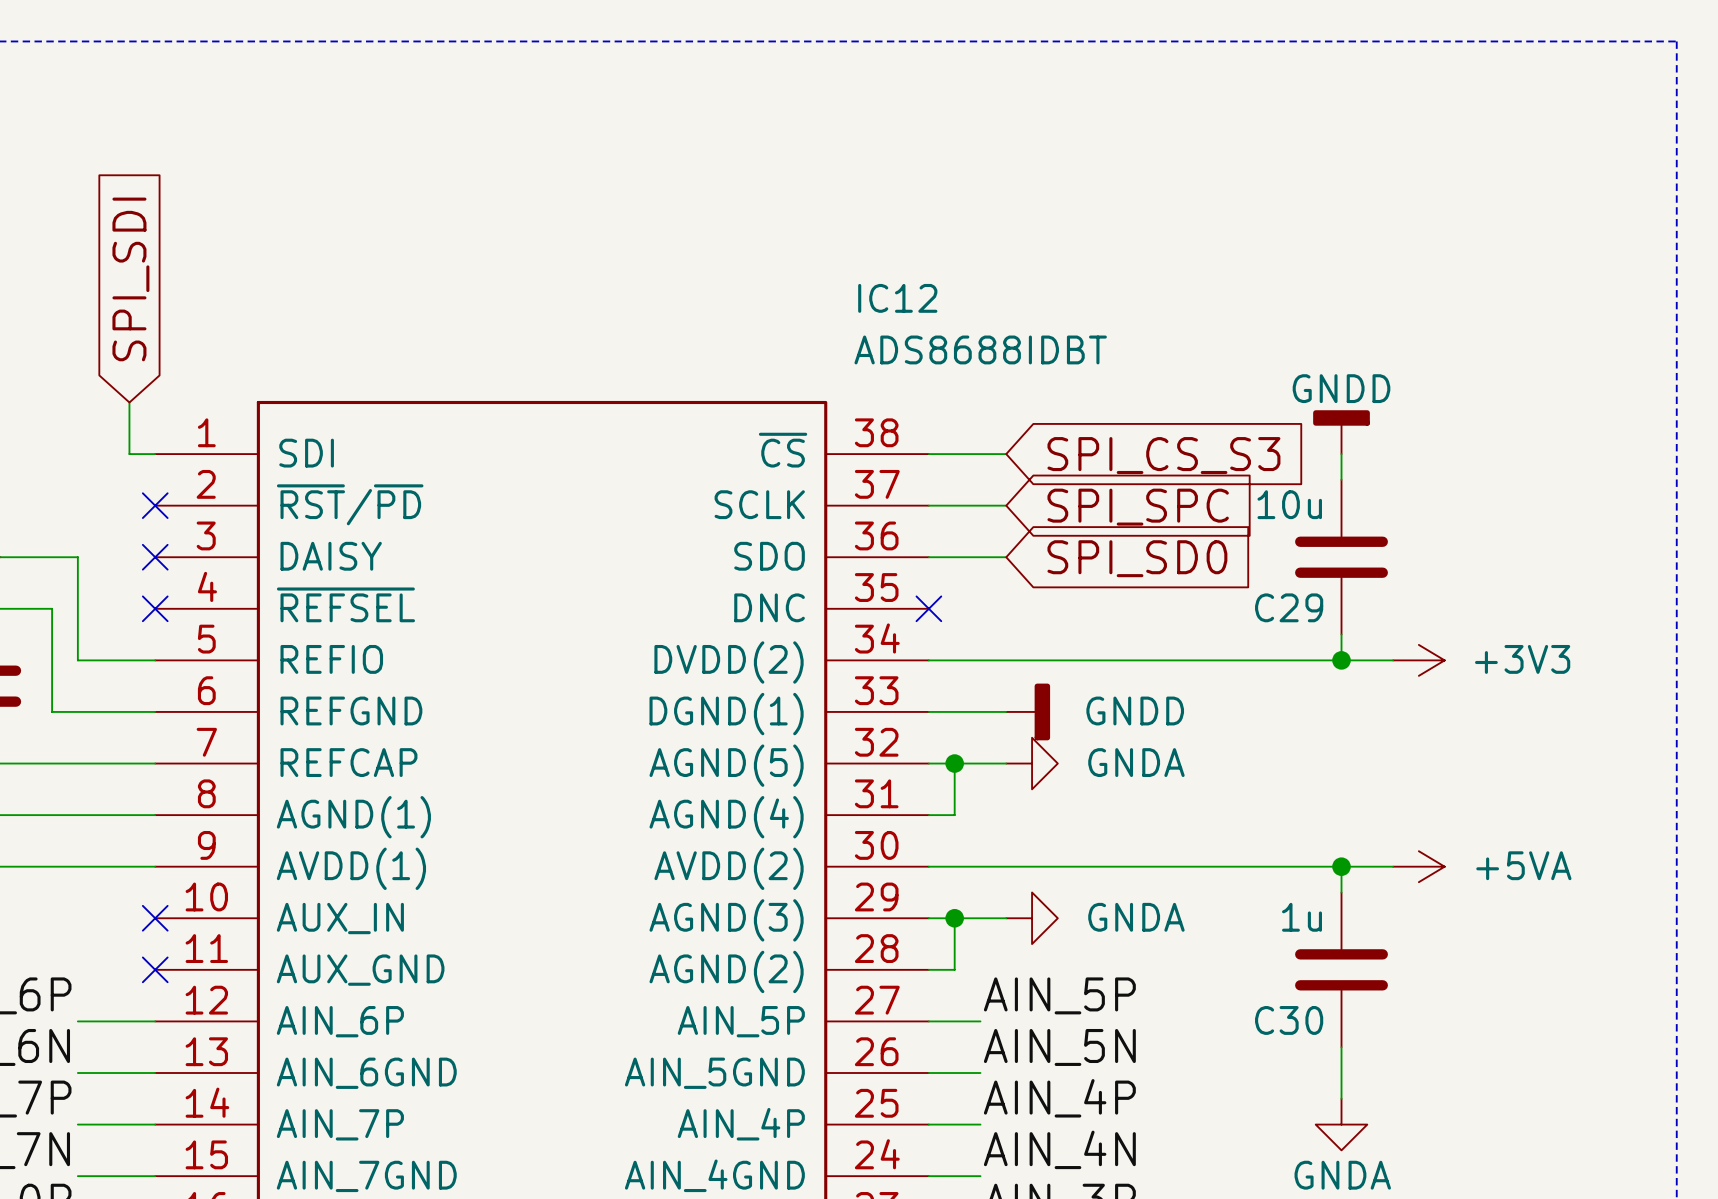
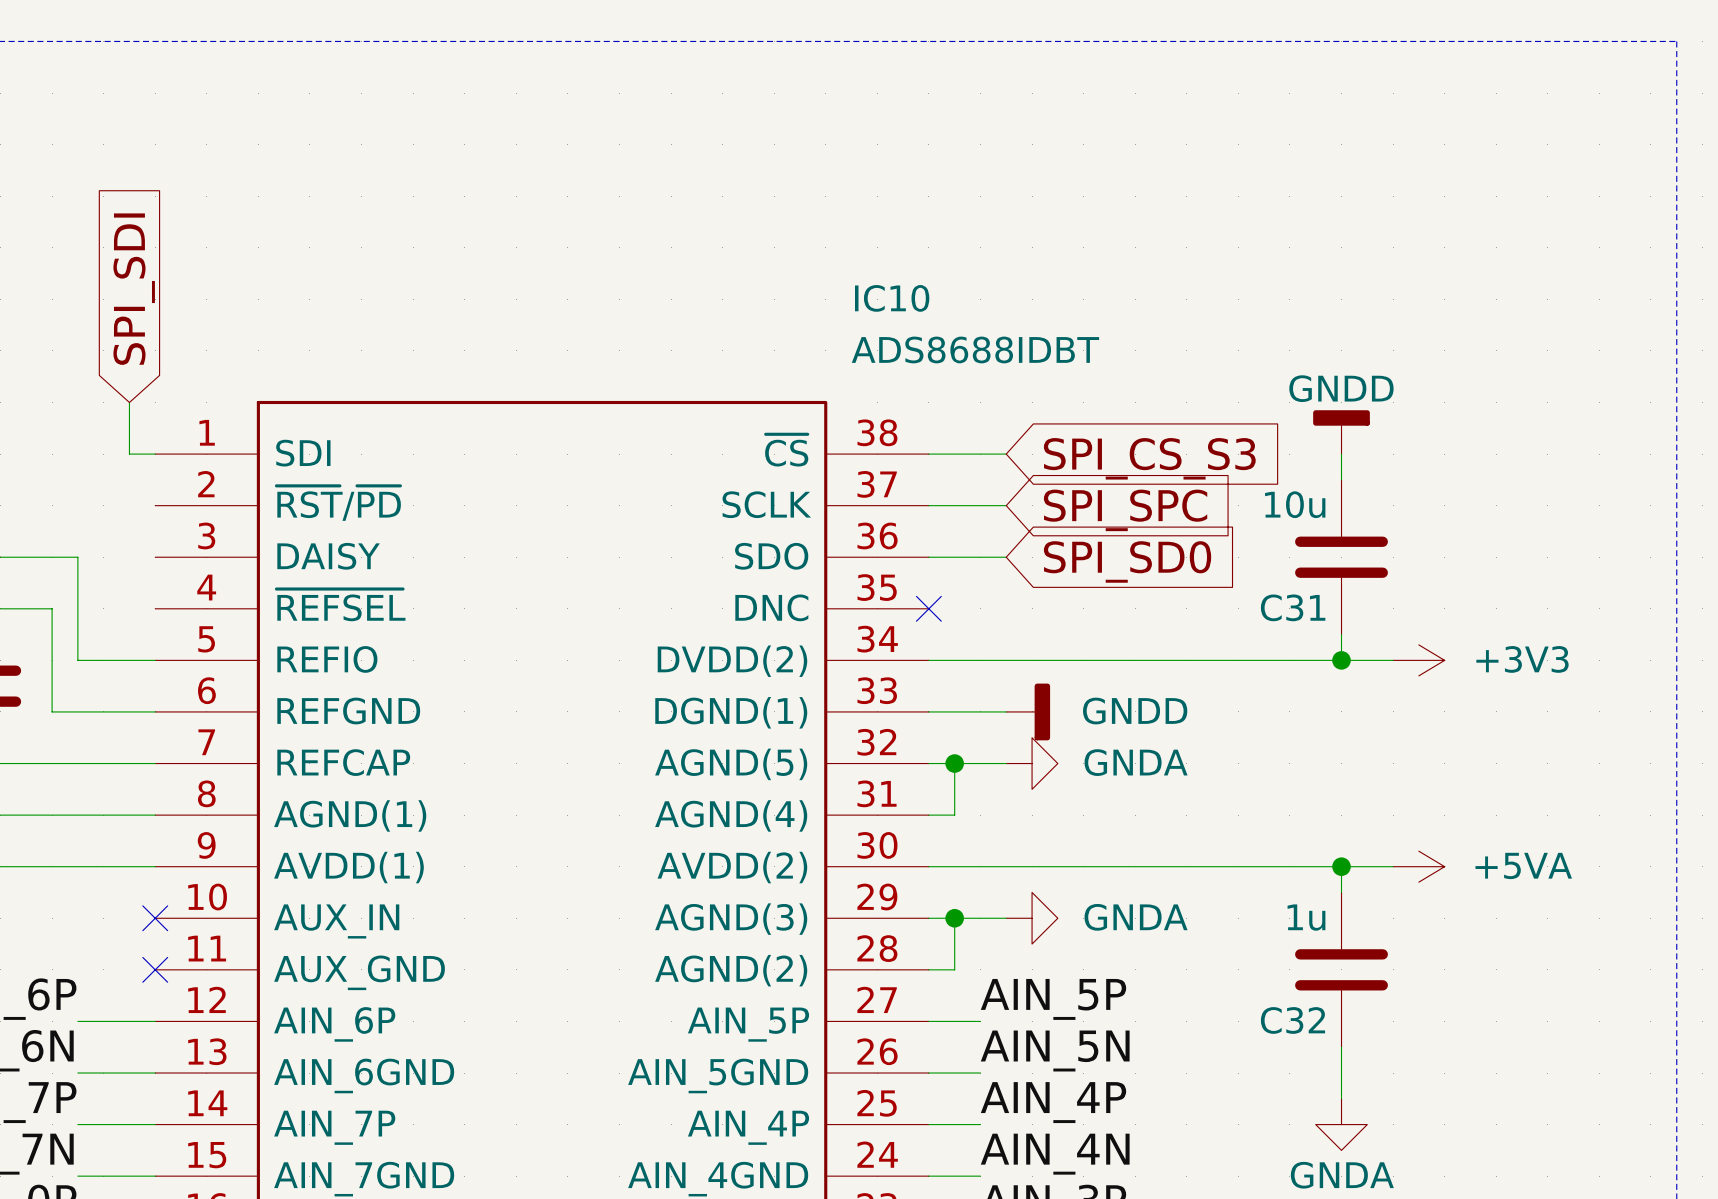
IC12 name: IC12 (897, 298) -> IC10 (892, 298)
no-connect mark: (155, 505) -> none
no-connect mark: (155, 557) -> none
C29 name: C29 (1289, 607) -> C31 (1293, 607)
no-connect mark: (155, 608) -> none
C30 name: C30 (1289, 1020) -> C32 (1292, 1020)

